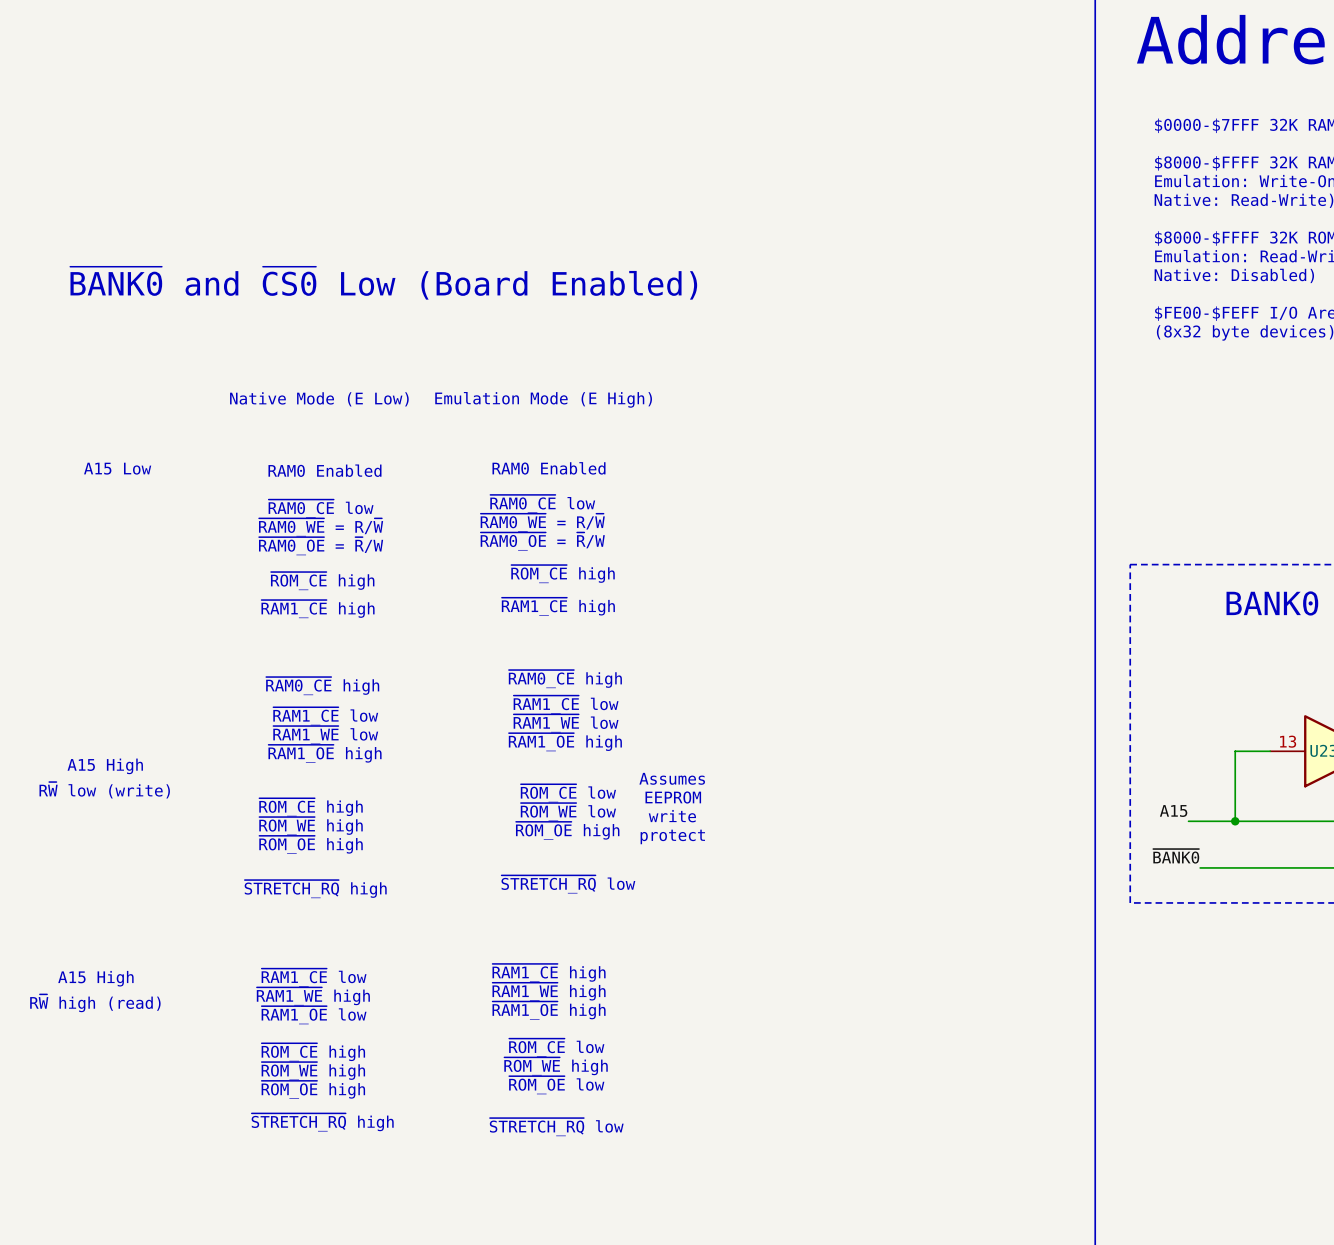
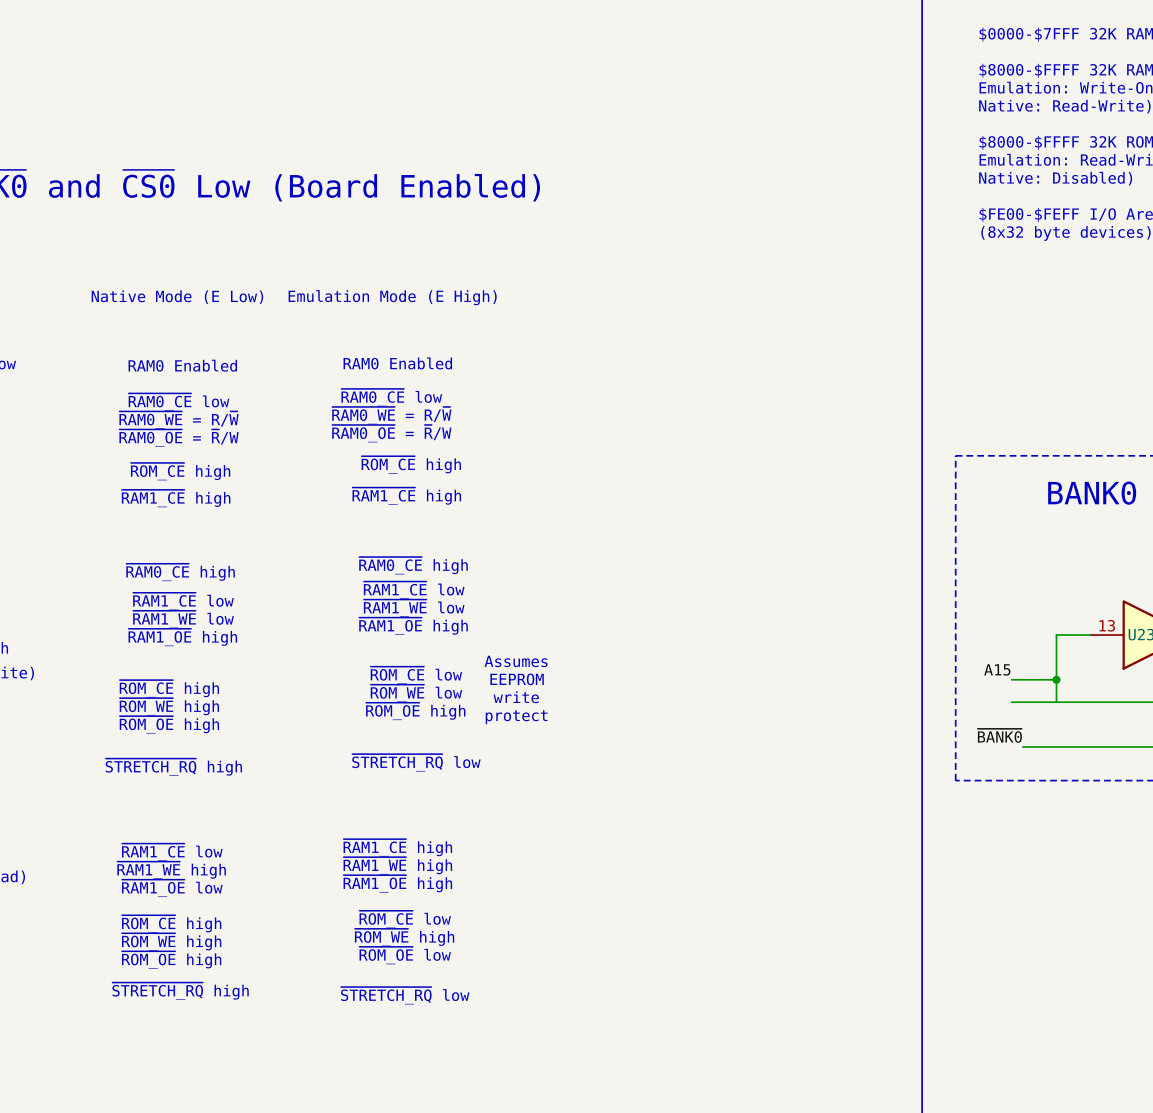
wire: none -> (1011, 679) (1056, 679)
label position: A15 (1173, 810) -> A15 (997, 669)
junction position: (1235, 821) -> (1056, 679)

